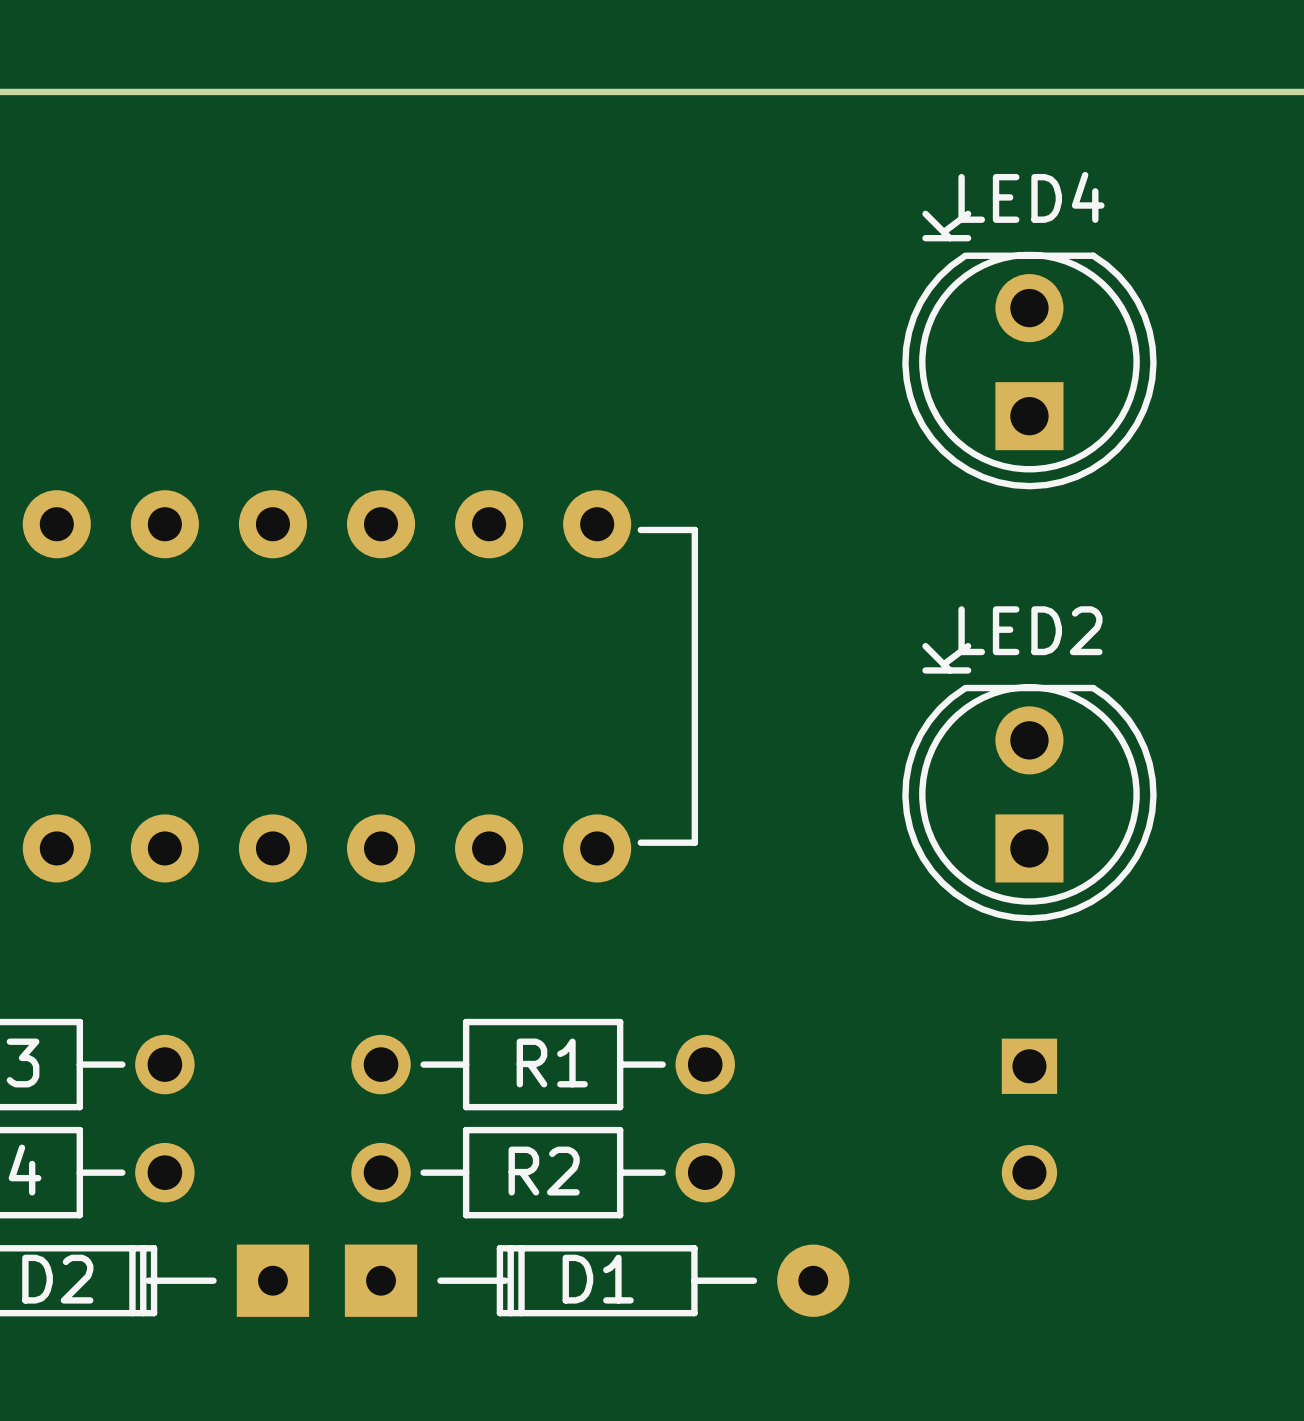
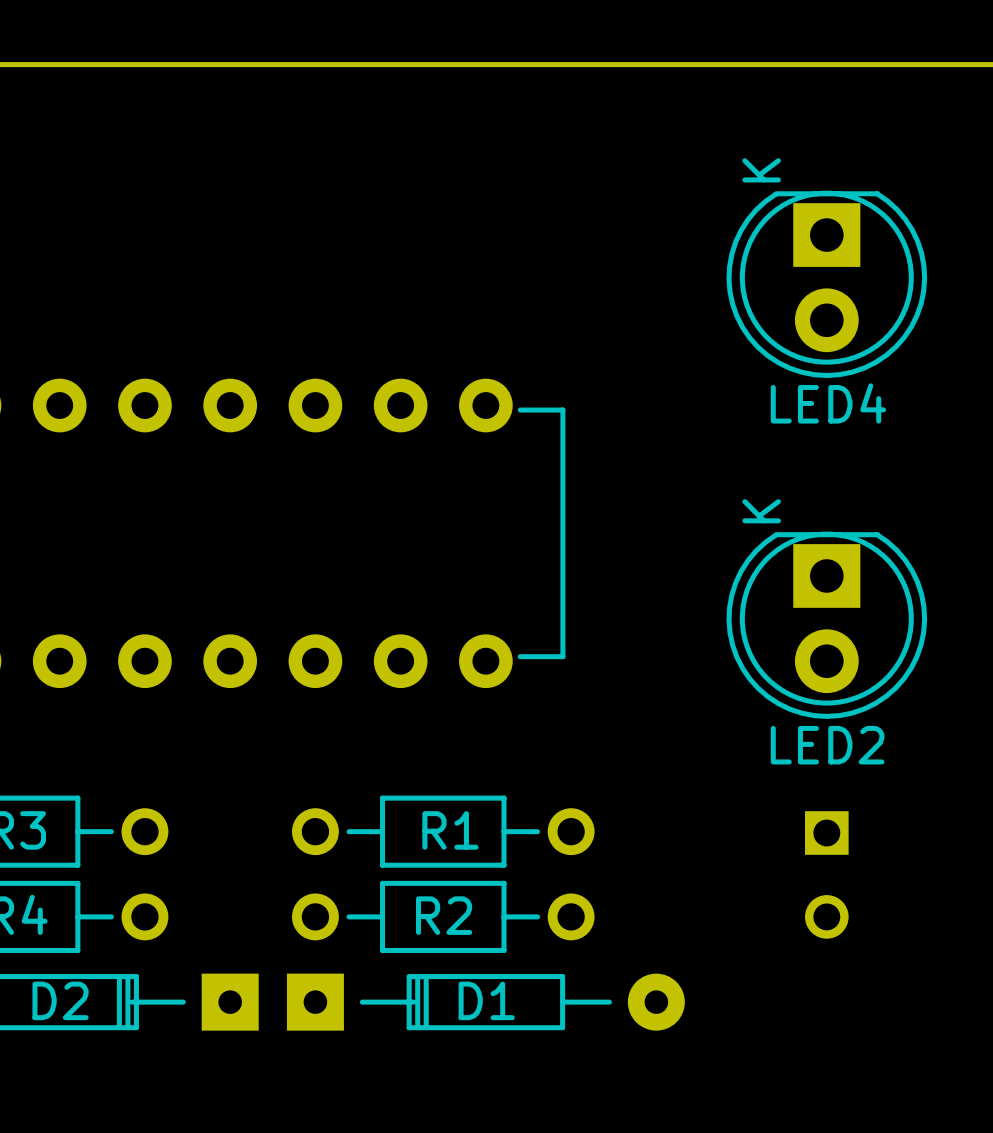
LED4 name position: LED4 (1031, 197) -> LED4 (828, 403)
LED4 footprint: [902, 251, 1157, 490] -> [726, 190, 928, 379]
LED2 name position: LED2 (1030, 630) -> LED2 (827, 745)
LED2 footprint: [902, 684, 1157, 922] -> [726, 531, 928, 719]

